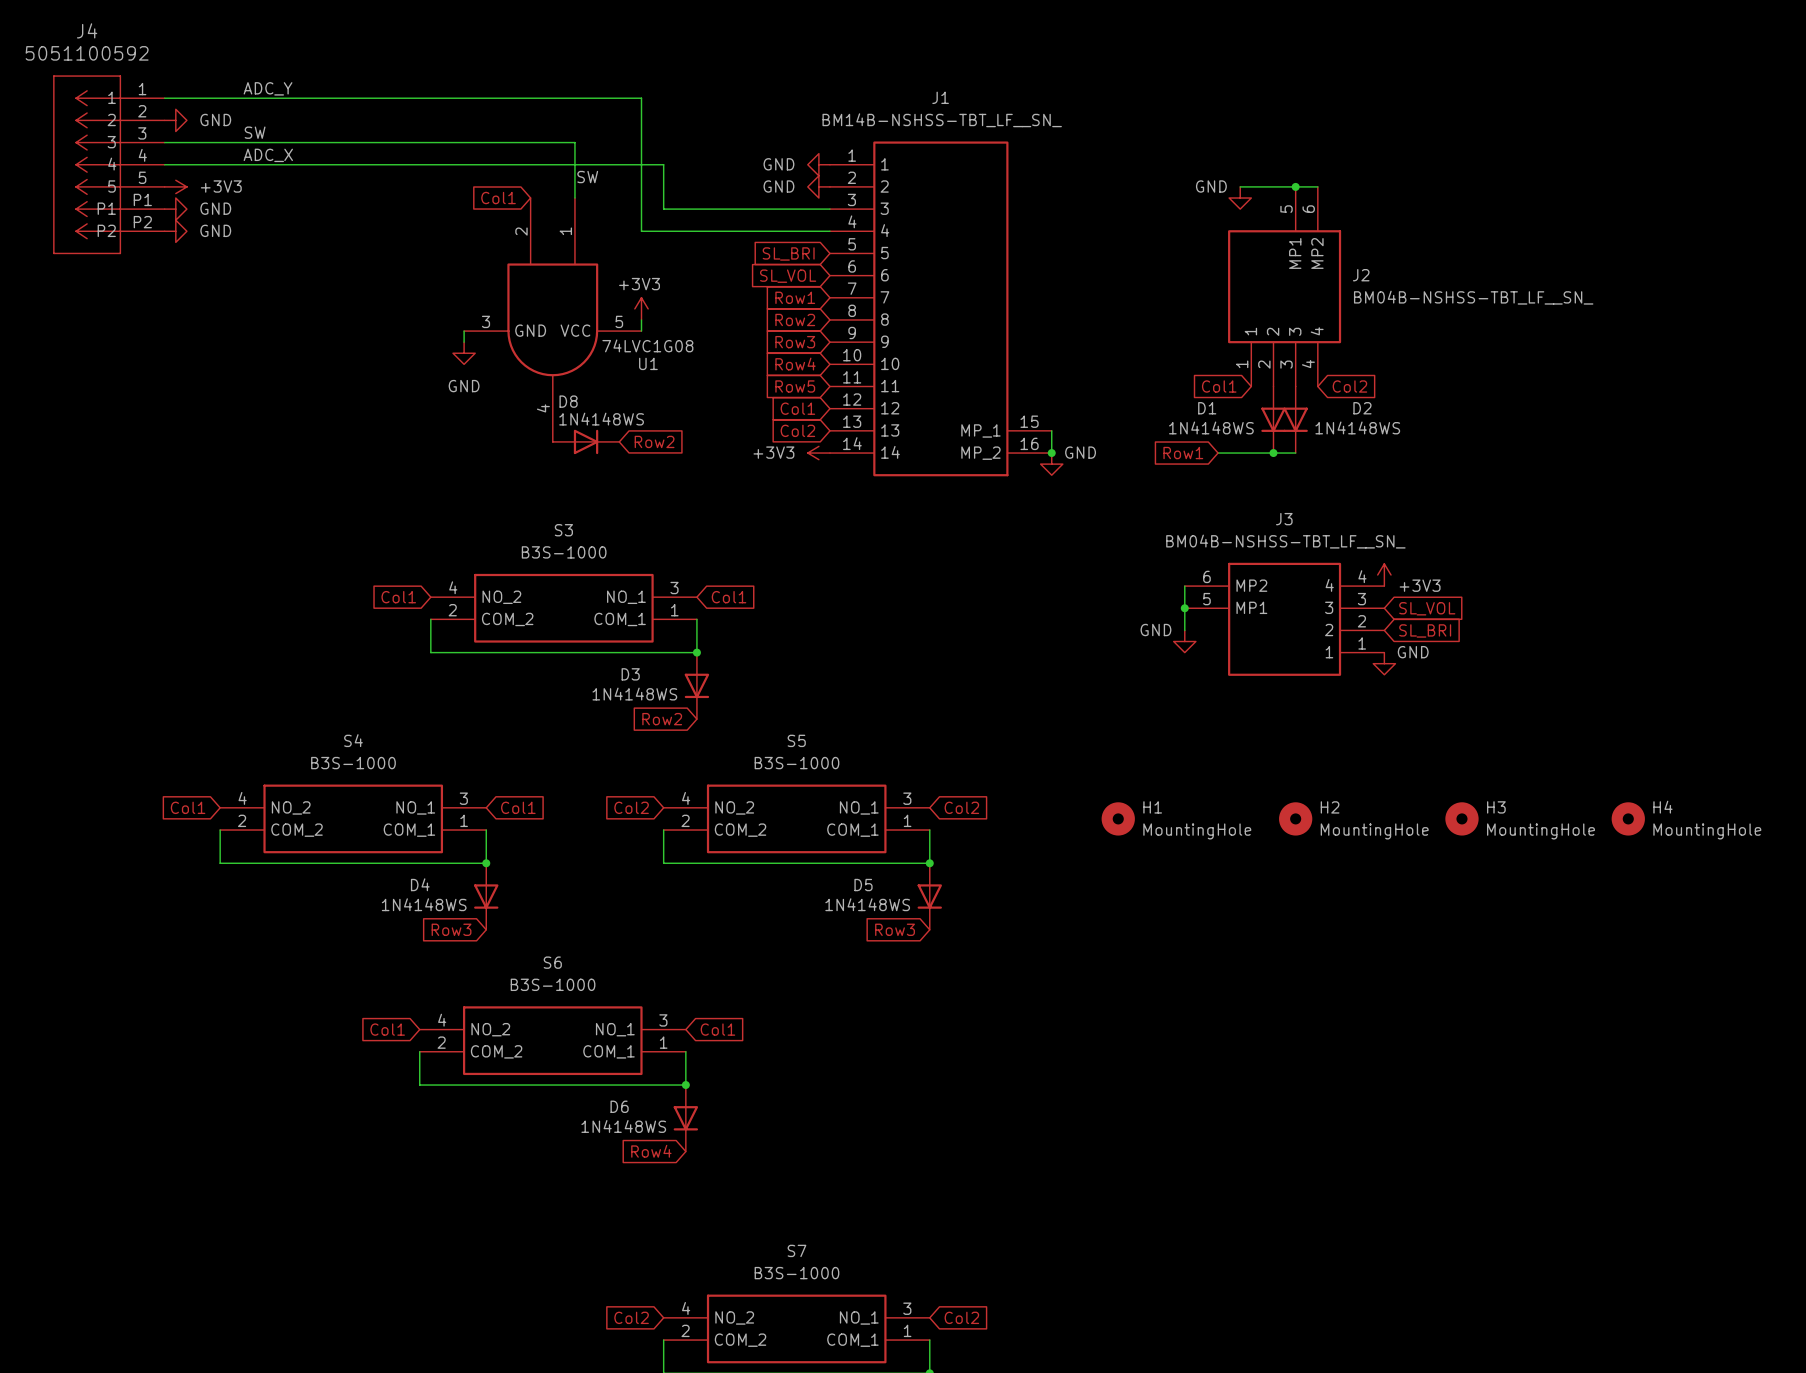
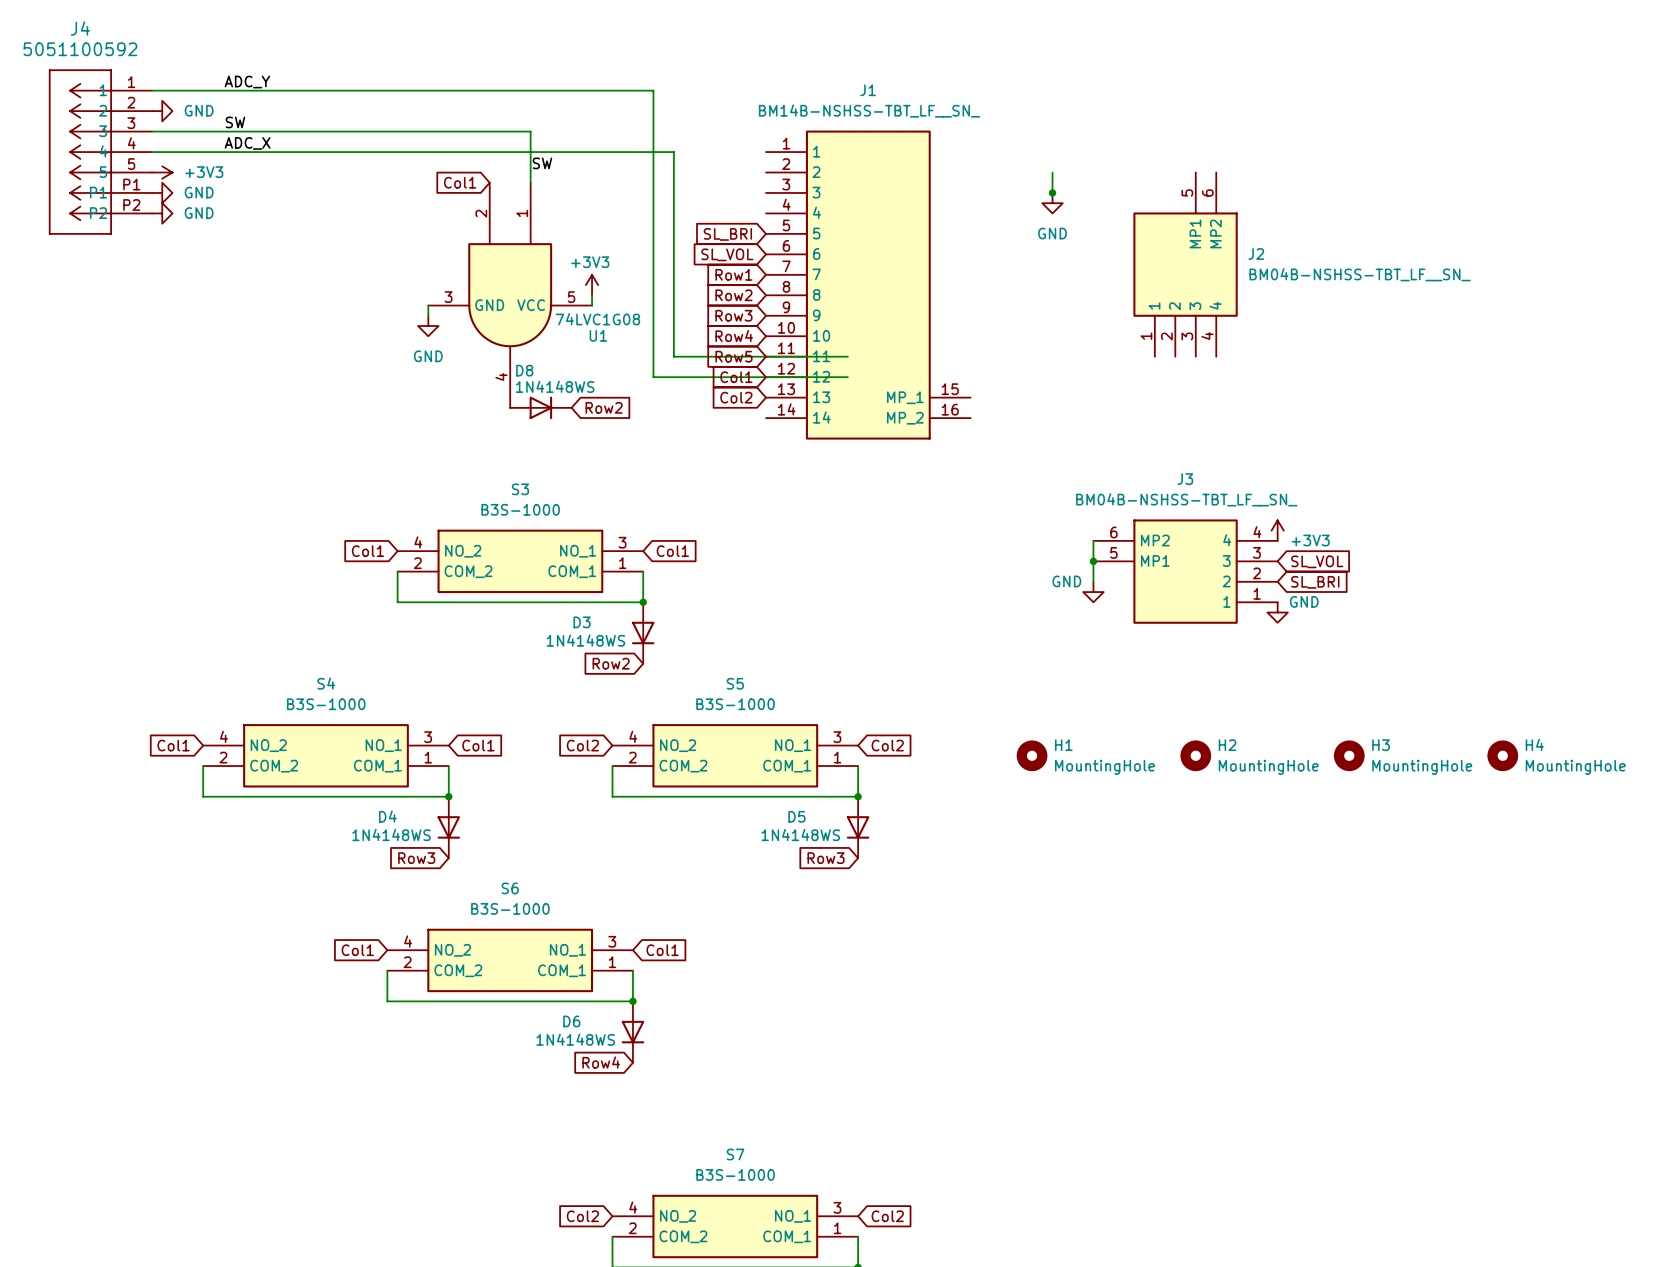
wire: (641, 98) (641, 231) (829, 231) -> (592, 90) (653, 90) (653, 377) (847, 377)
wire: (663, 164) (663, 209) (829, 209) -> (612, 152) (673, 152) (673, 356) (847, 356)
power symbol: GND (818, 164) -> none
power symbol: GND (818, 186) -> none
wire: none -> (1052, 172) (1052, 192)
power symbol text position: GND (1211, 186) -> GND (1052, 233)
wire: (1240, 186) (1317, 186) -> none
junction: (1295, 186) -> none
power symbol position: GND (1240, 198) -> GND (1052, 203)
junction: none -> (1052, 192)
global label: Col1 (1219, 386) -> none
global label: Col2 (1349, 386) -> none
D1: 1N4148WS (1273, 419) -> none
D2: 1N4148WS (1295, 419) -> none
wire: (1051, 430) (1051, 453) -> none
power symbol: +3V3 (818, 453) -> none
junction: (1051, 453) -> none
global label: Row1 (1183, 453) -> none
wire: (1218, 453) (1295, 453) -> none
junction: (1273, 453) -> none
power symbol: GND (1051, 464) -> none

